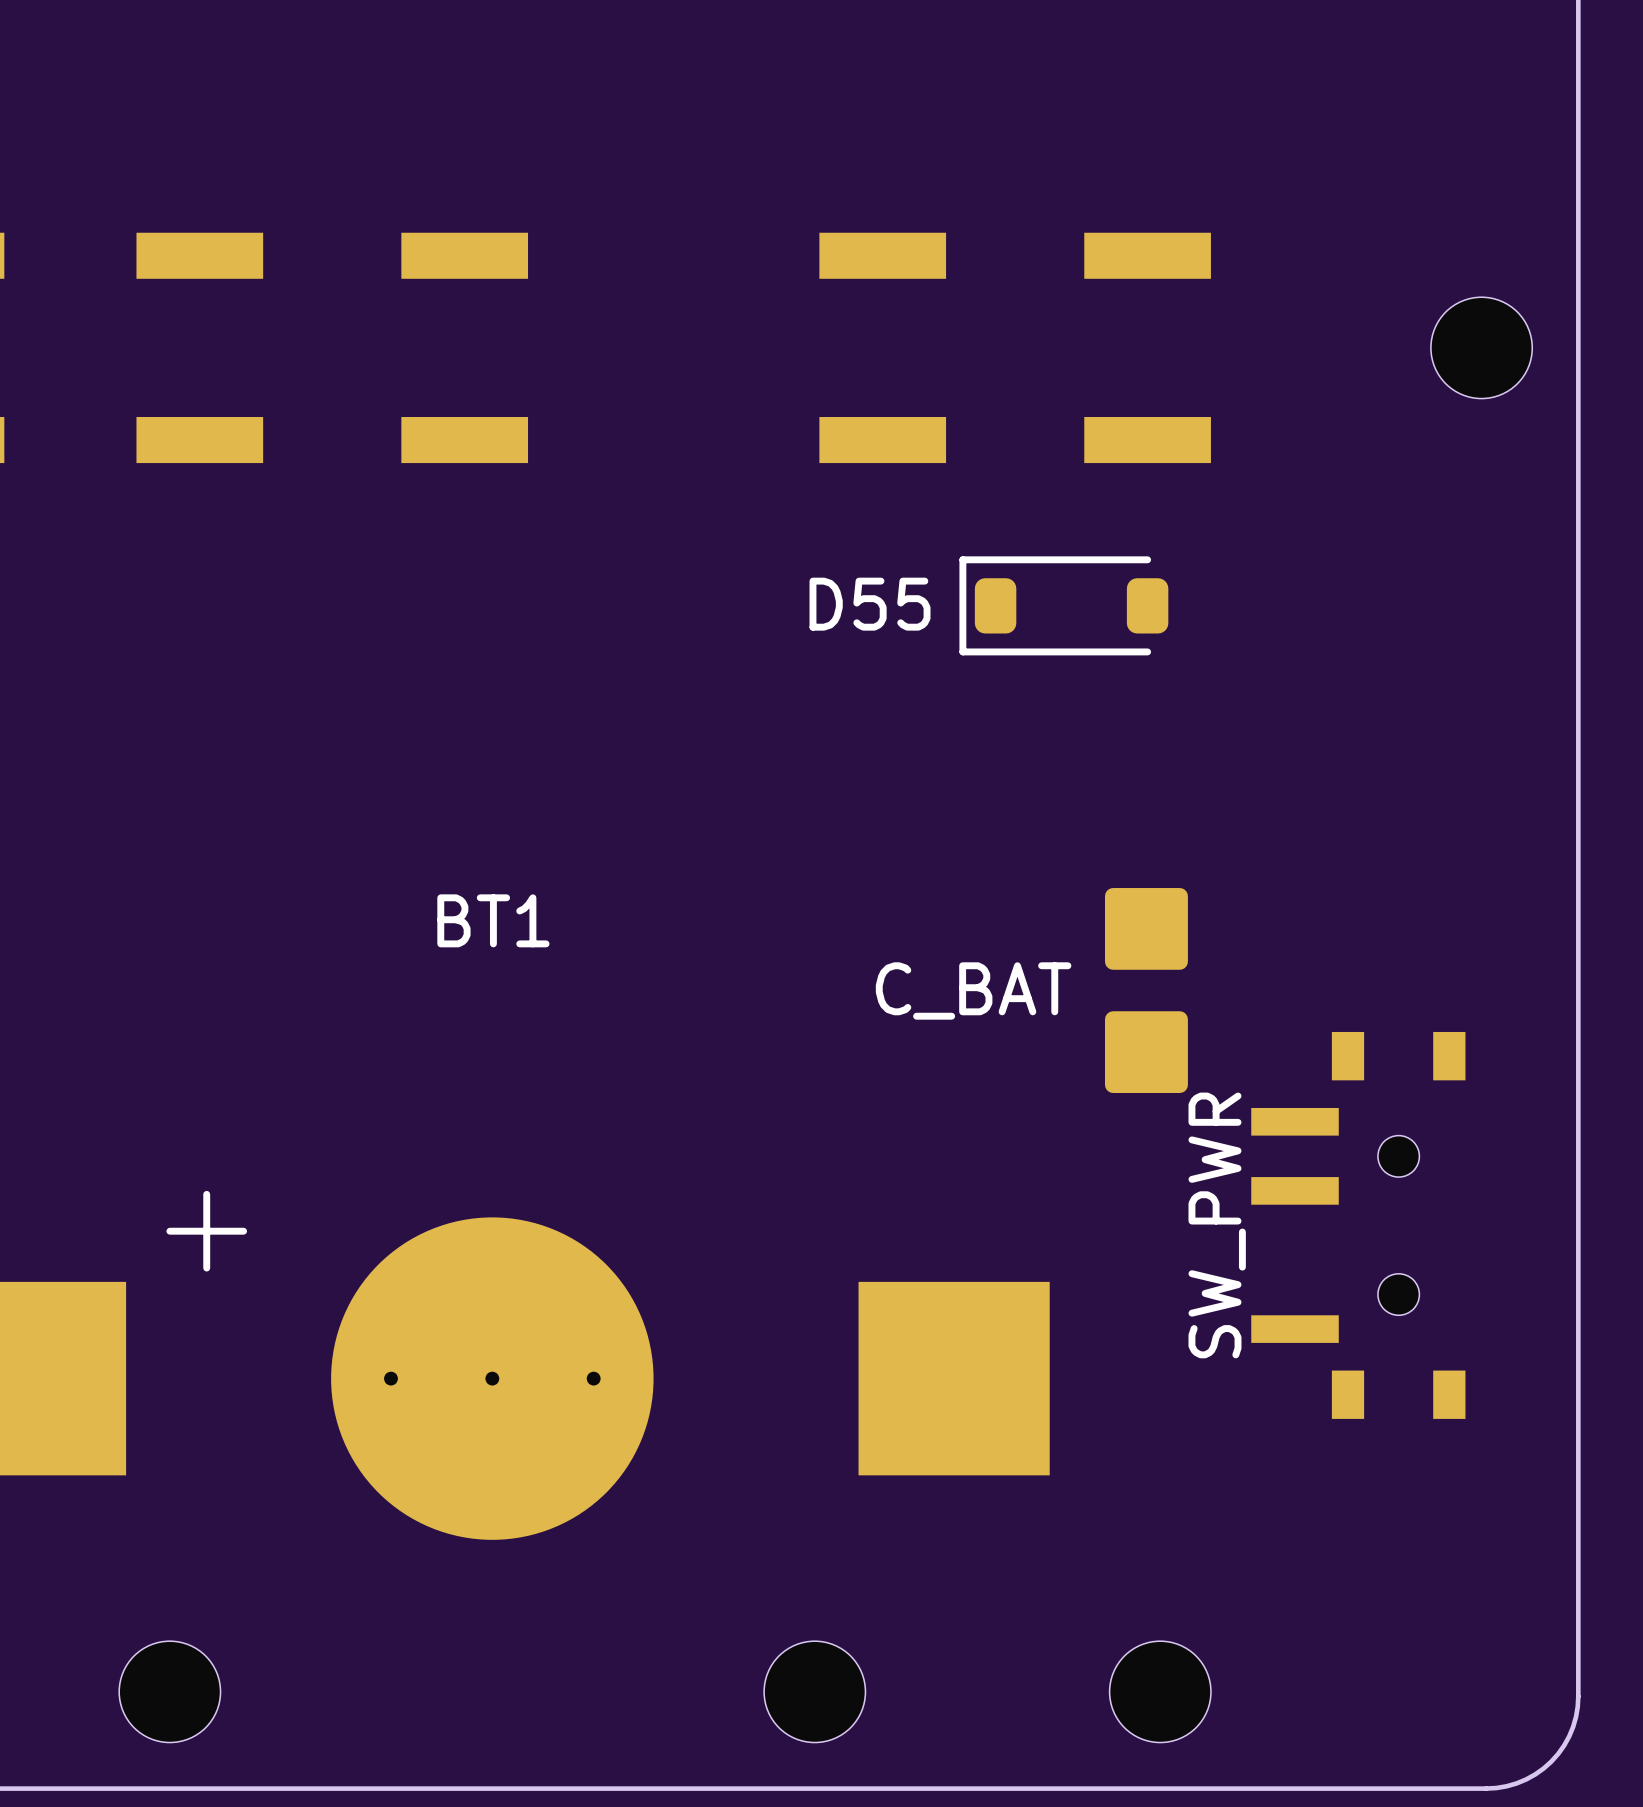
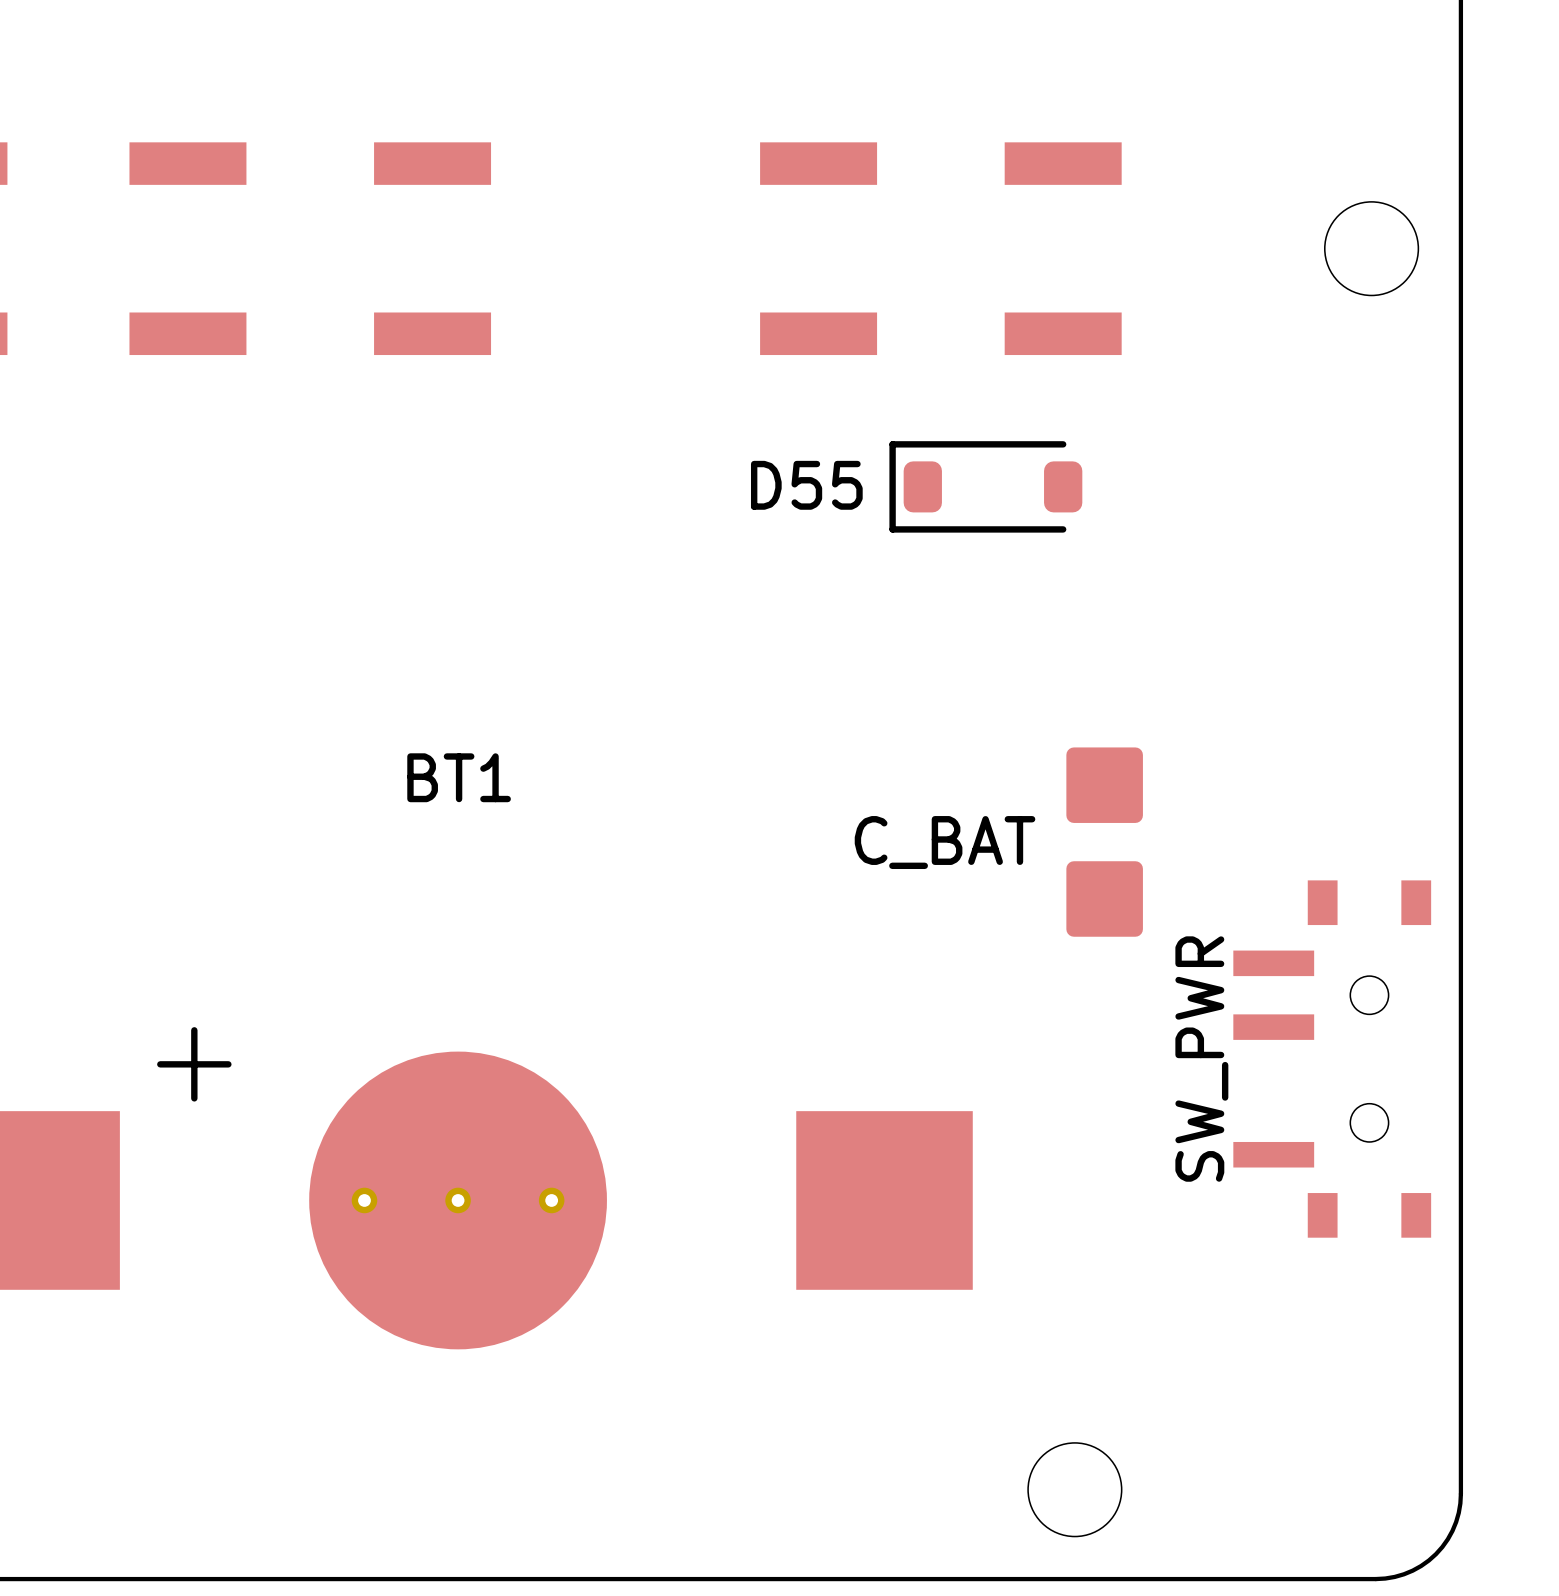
C_BAT position: (1146, 990) -> (1104, 842)
SW_PWR position: (1358, 1225) -> (1332, 1059)
part: (169, 1691) -> none
part: (814, 1691) -> none

